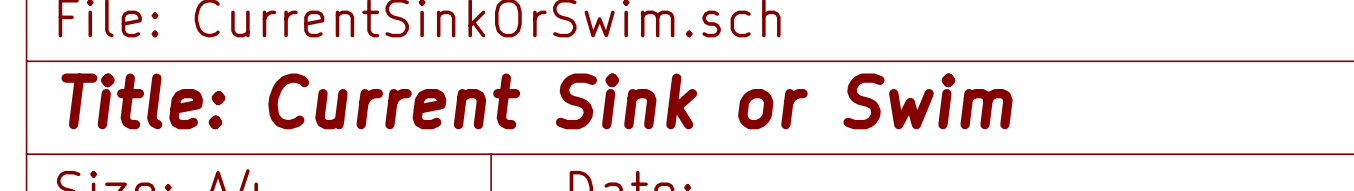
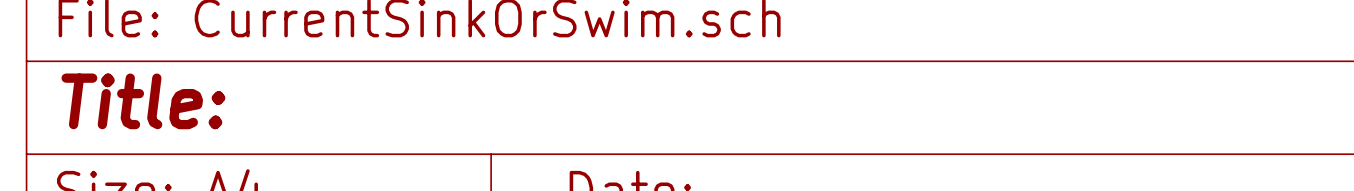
title block: Title: Current Sink or Swim (537, 101) -> Title: (143, 101)

